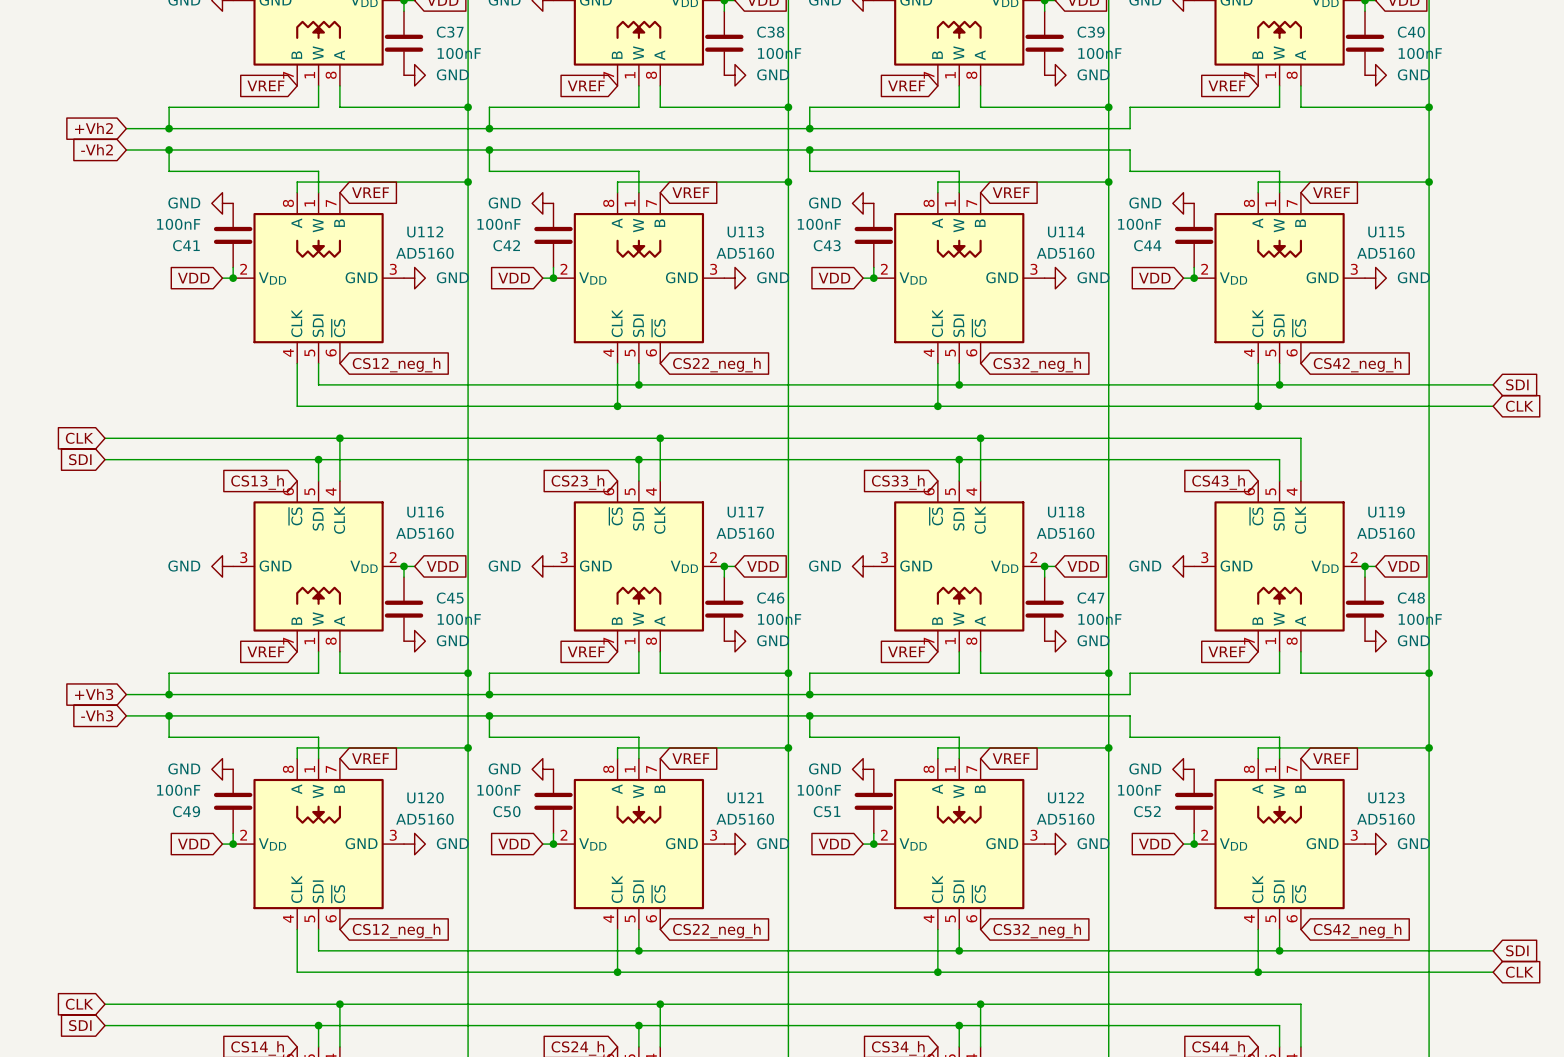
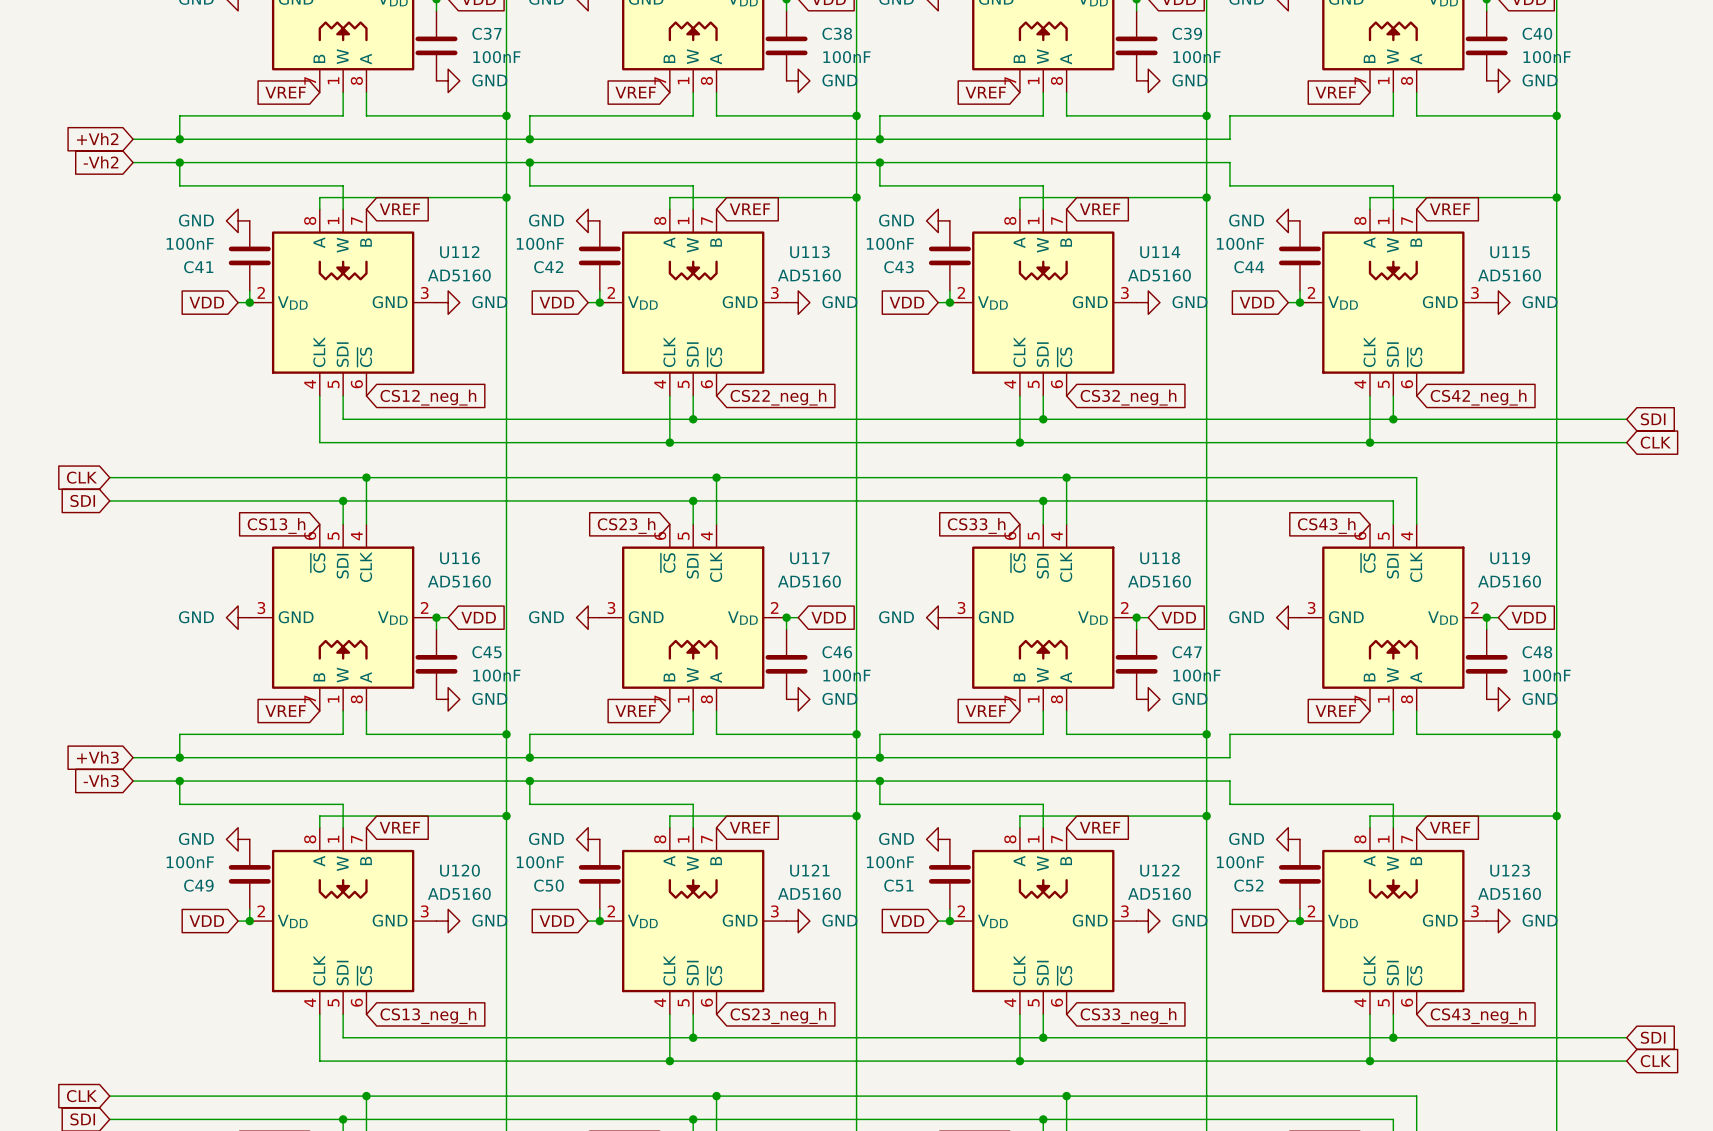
global label: CS12_neg_h (396, 930) -> CS13_neg_h (428, 1016)
global label: CS22_neg_h (716, 930) -> CS23_neg_h (778, 1016)
global label: CS32_neg_h (1037, 930) -> CS33_neg_h (1128, 1016)
global label: CS42_neg_h (1357, 930) -> CS43_neg_h (1478, 1016)

